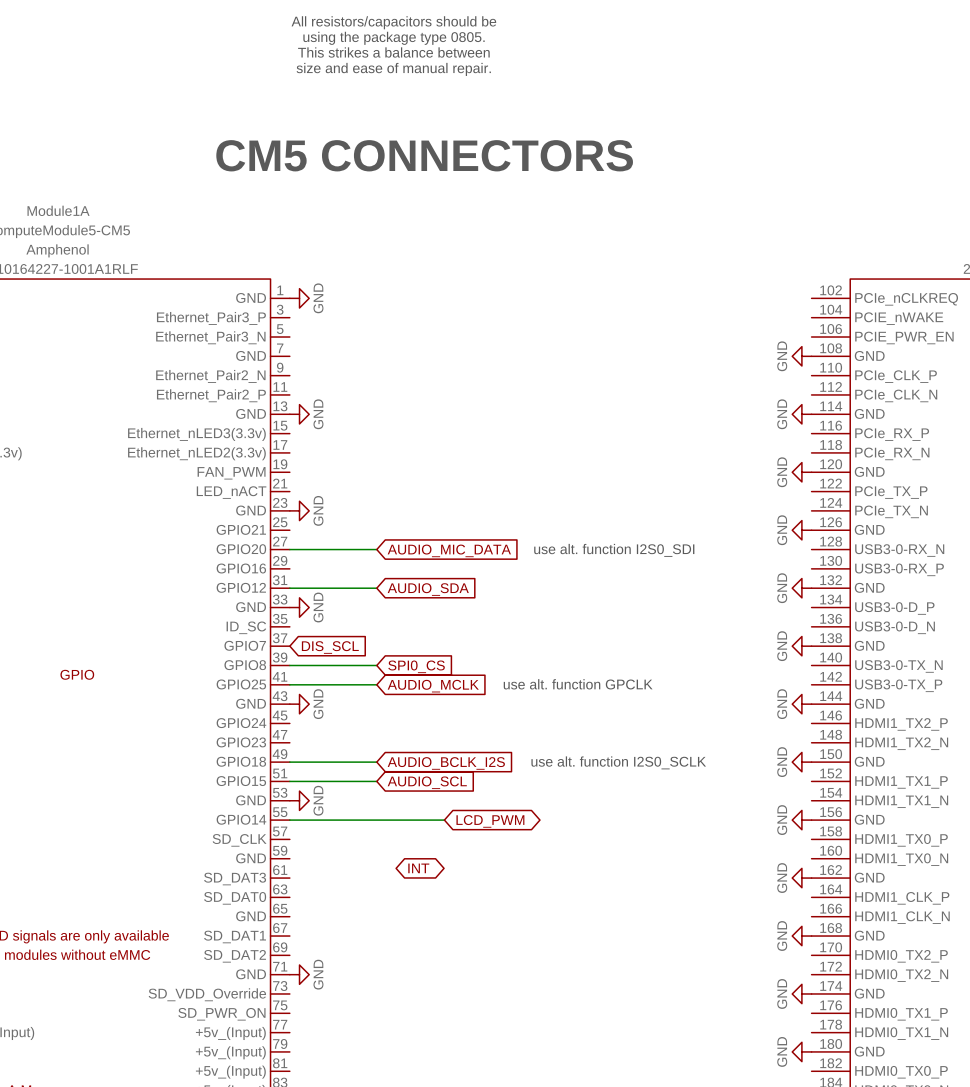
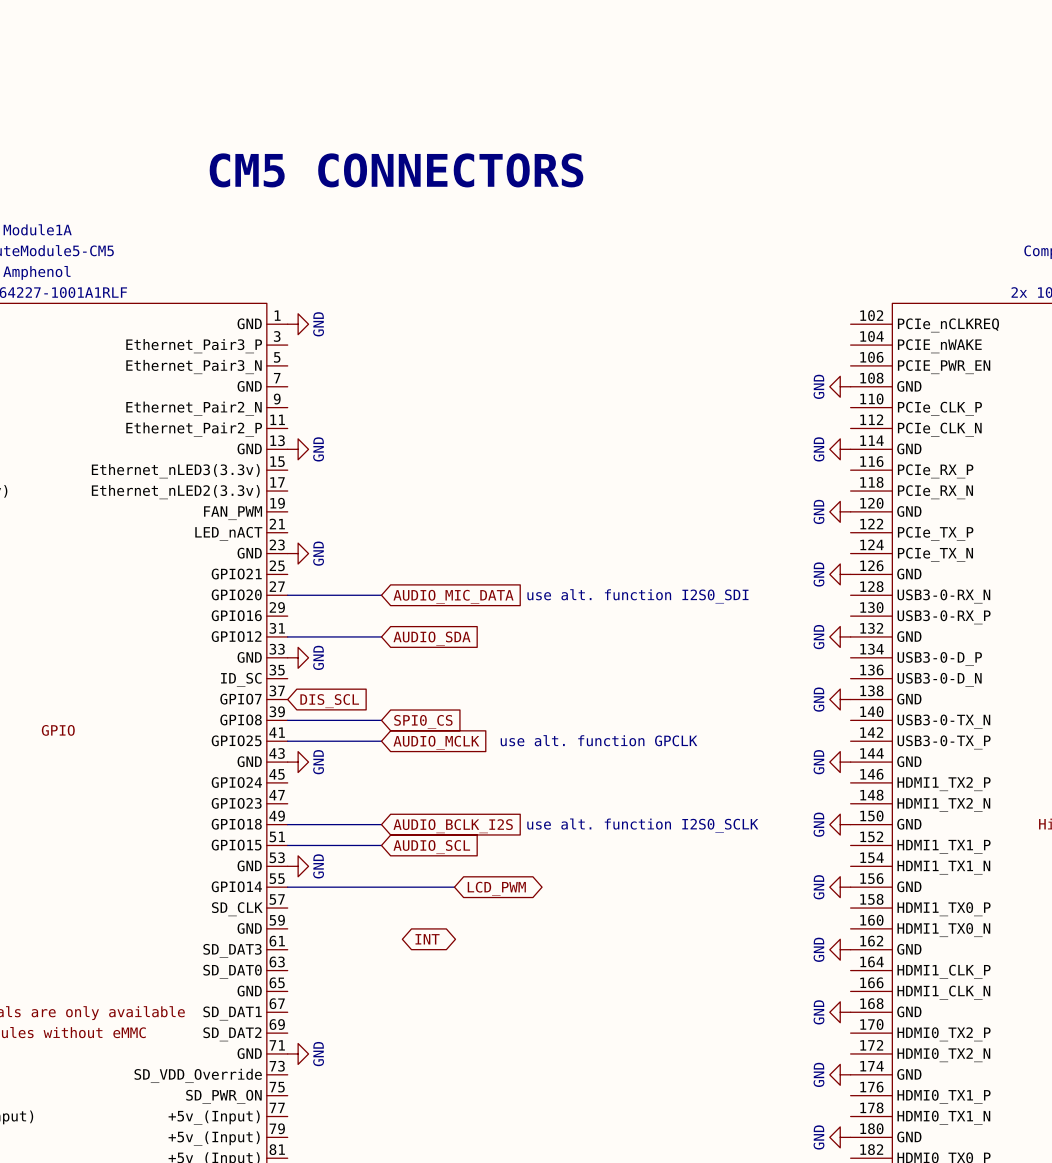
text: All resistors/capacitors should be (393, 22) -> none
text: using the package type 0805. (394, 38) -> none
text: This strikes a balance between (393, 52) -> none
text: size and ease of manual repair. (393, 69) -> none

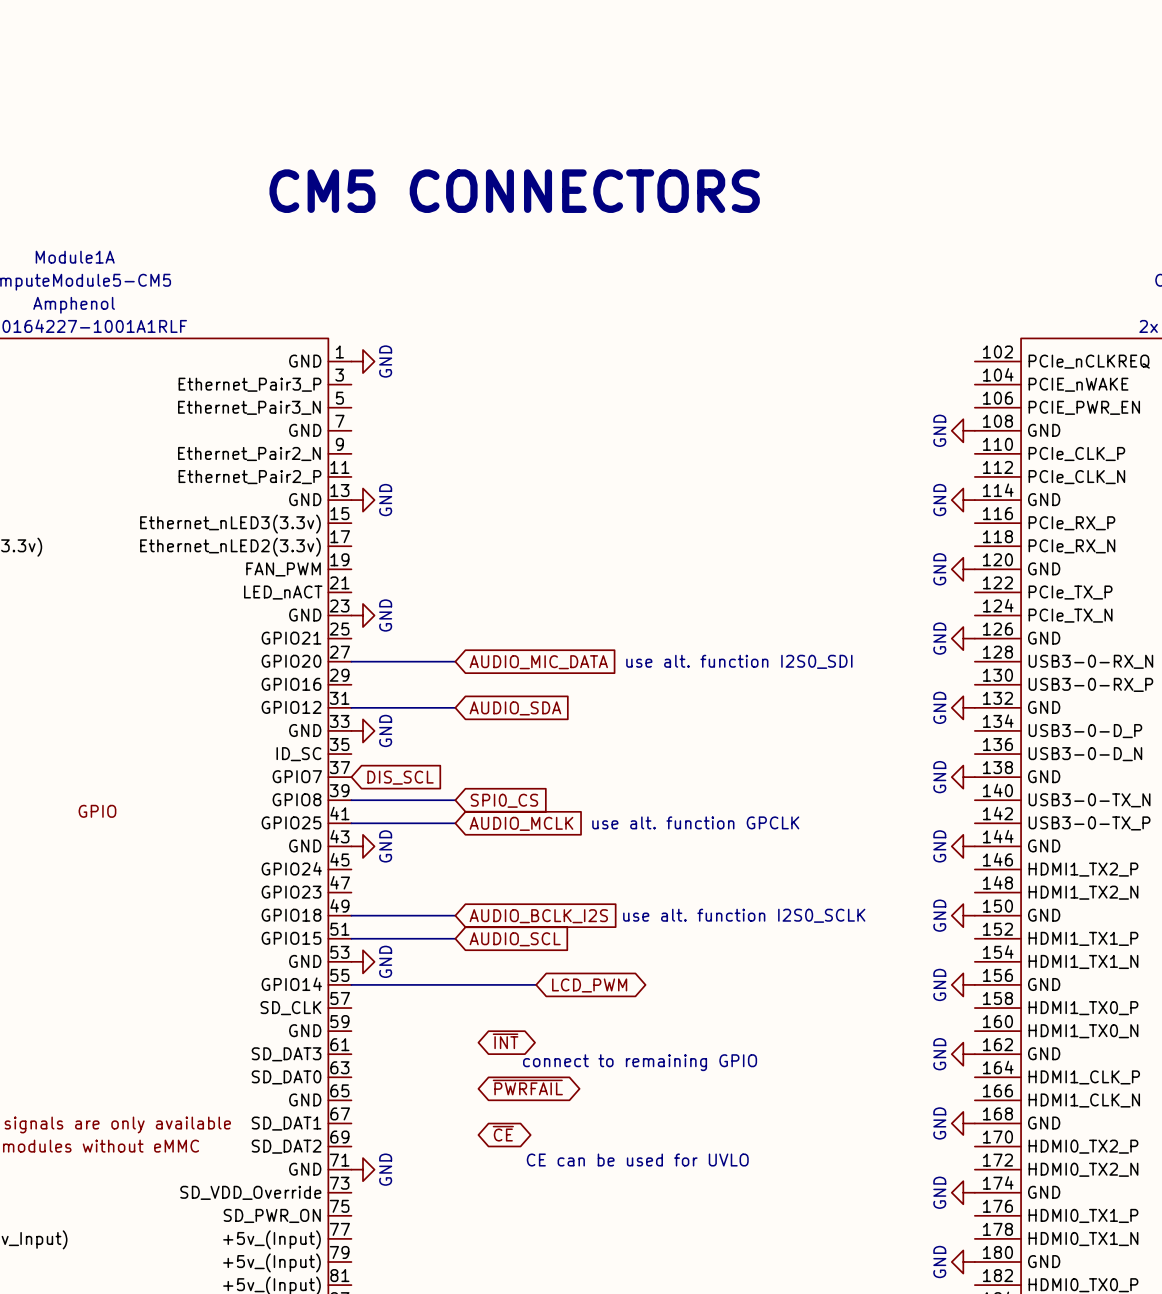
global label: INT (427, 939) -> ~{INT} (505, 1041)
text: none -> connect to remaining GPIO (640, 1062)
global label: none -> ~{PWRFAIL} (527, 1087)
global label: none -> ~{CE} (503, 1133)
text: none -> CE can be used for UVLO (637, 1160)

